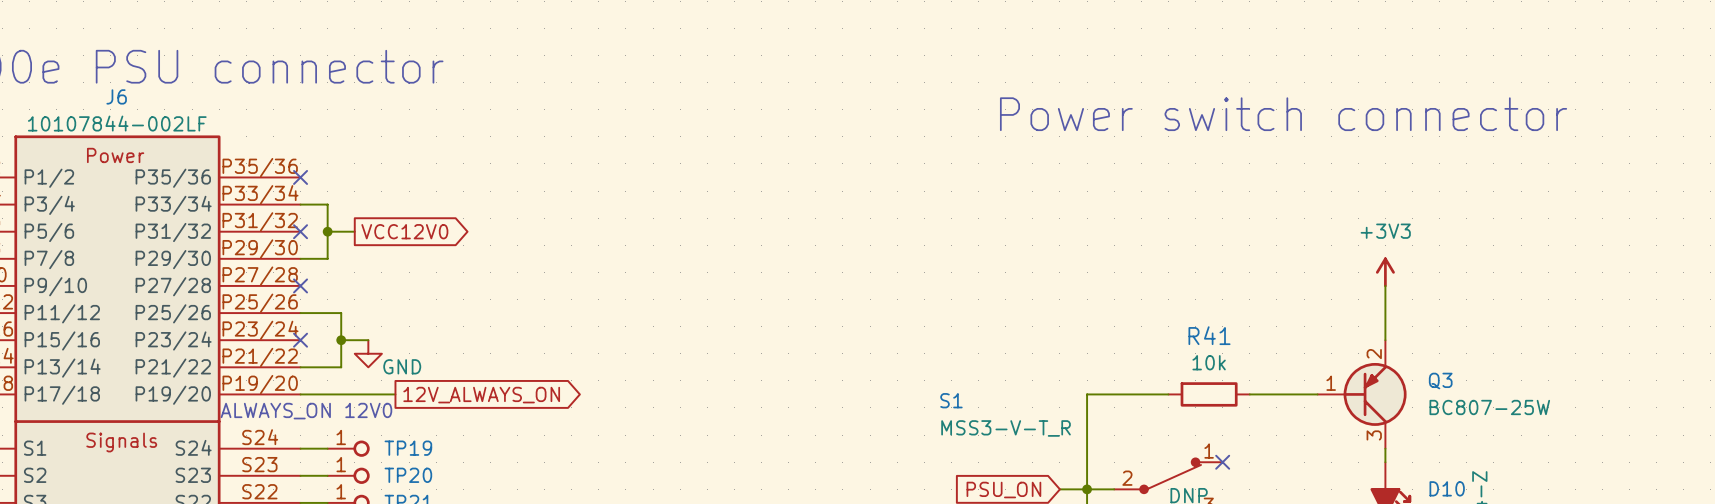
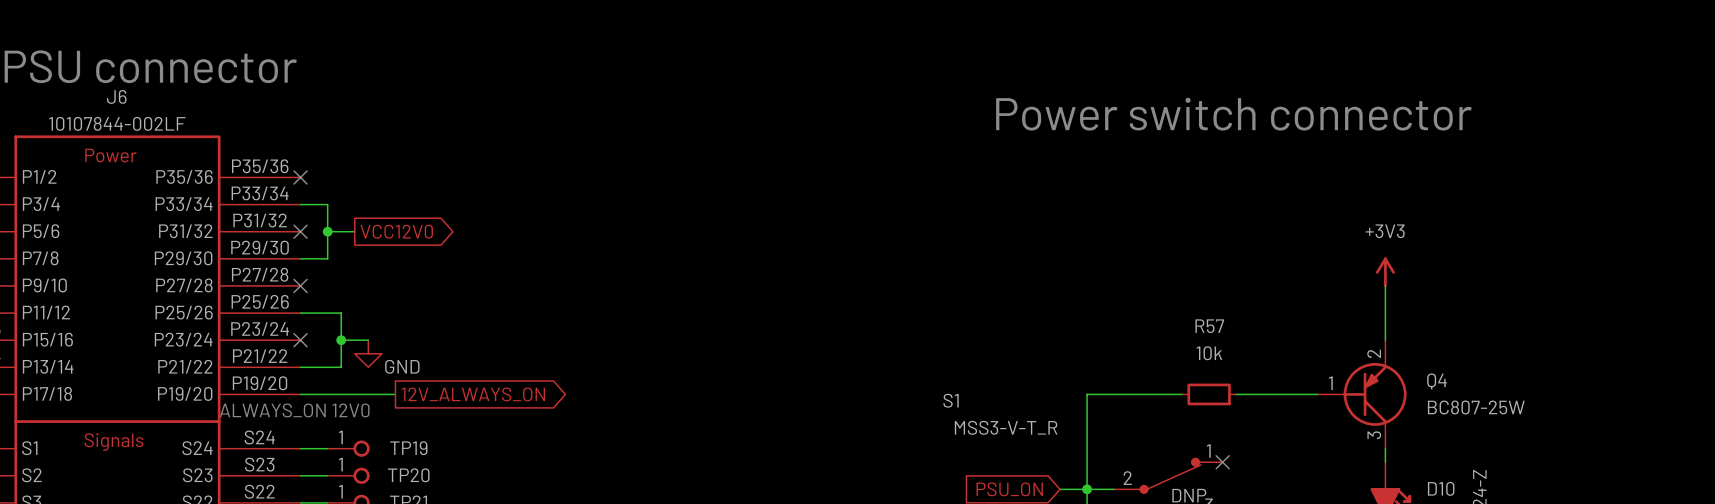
Q3 name: Q3 (1440, 381) -> Q4 (1436, 381)
R41: (1209, 394) -> none
R57: none -> (1209, 394)

